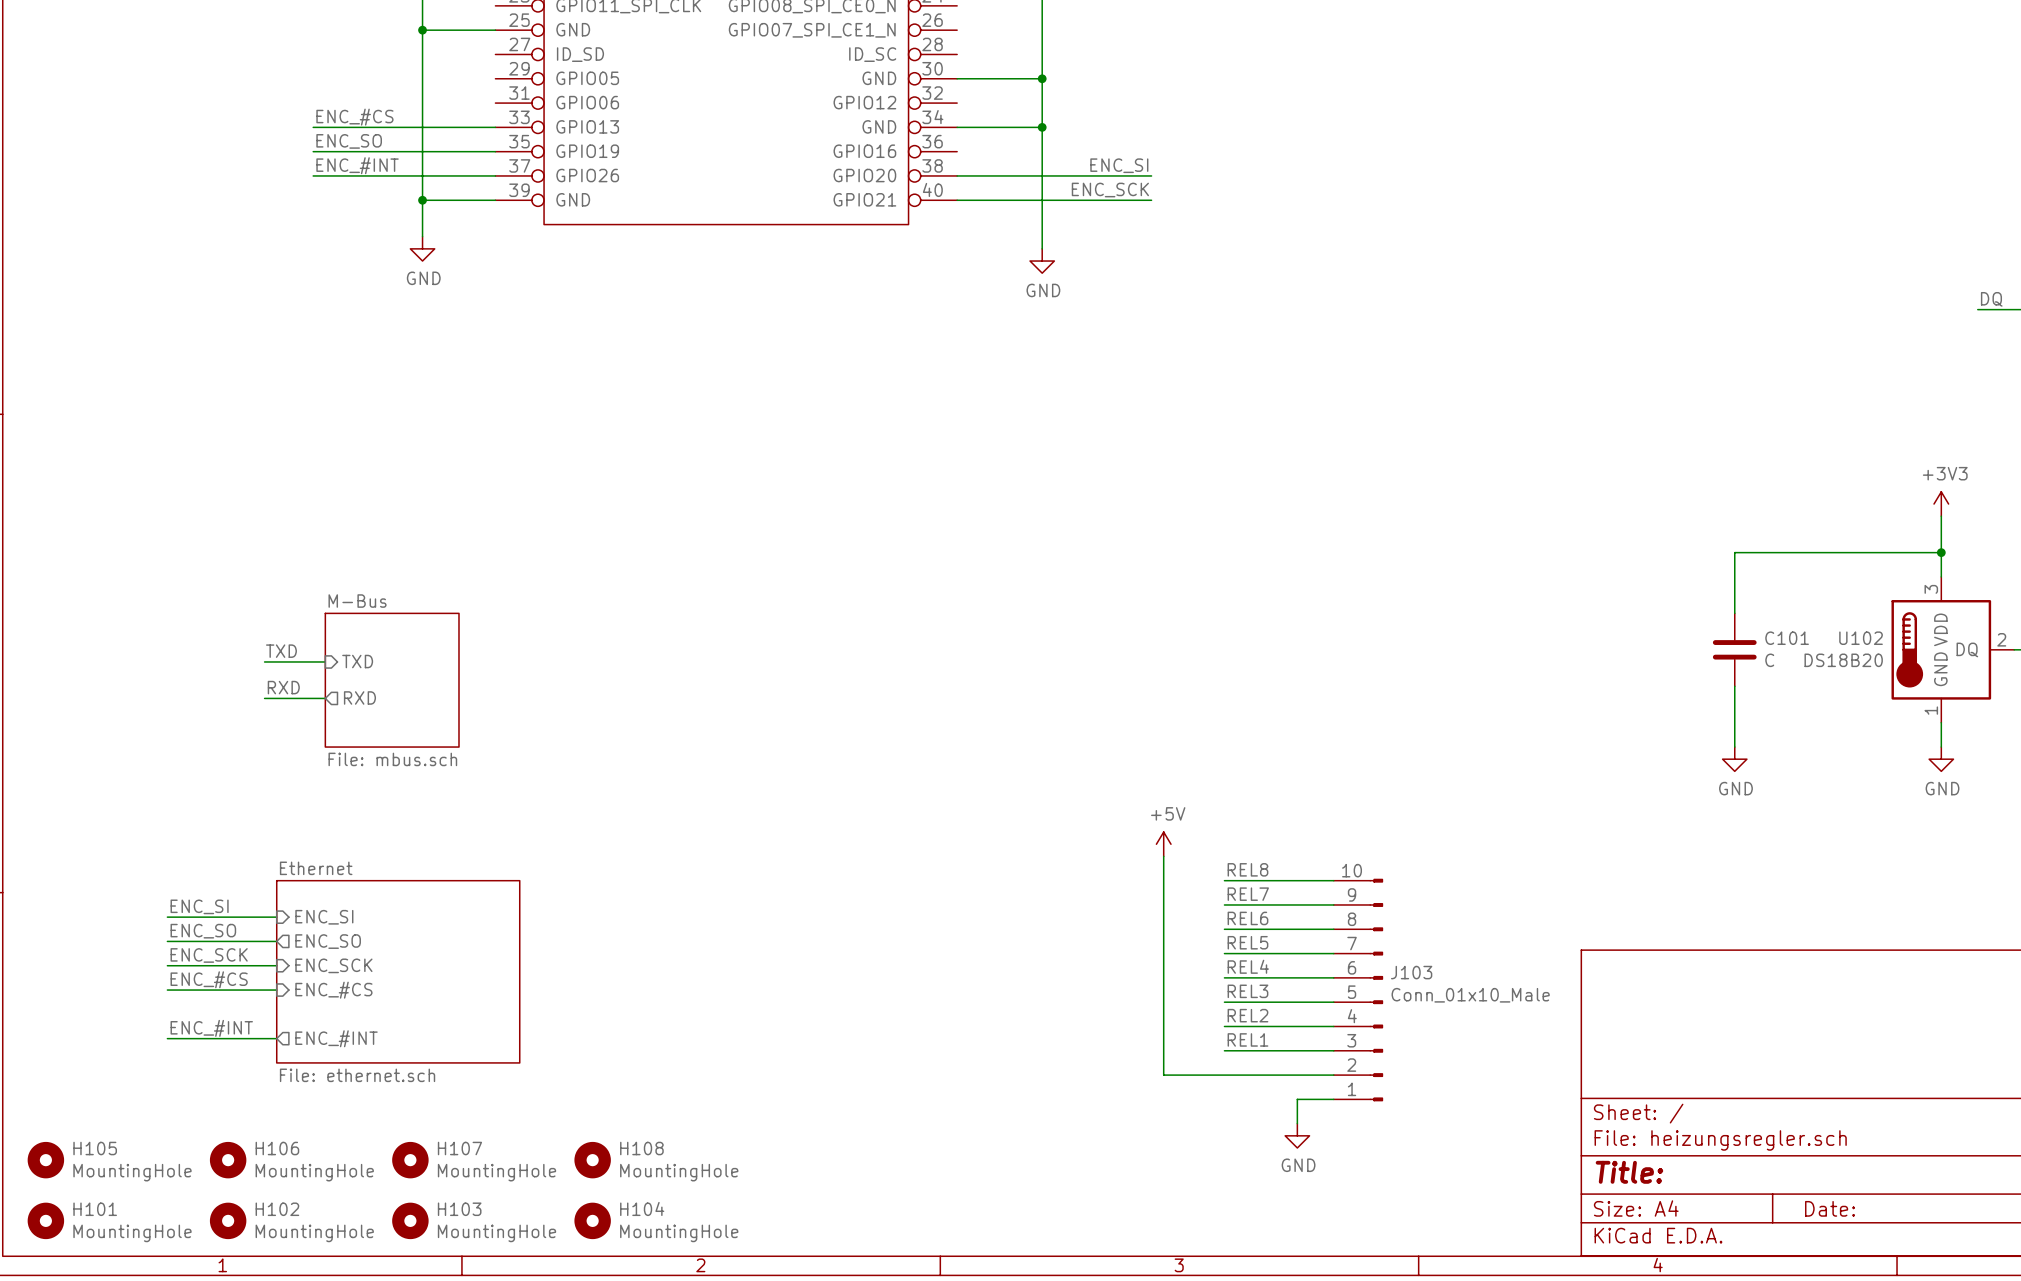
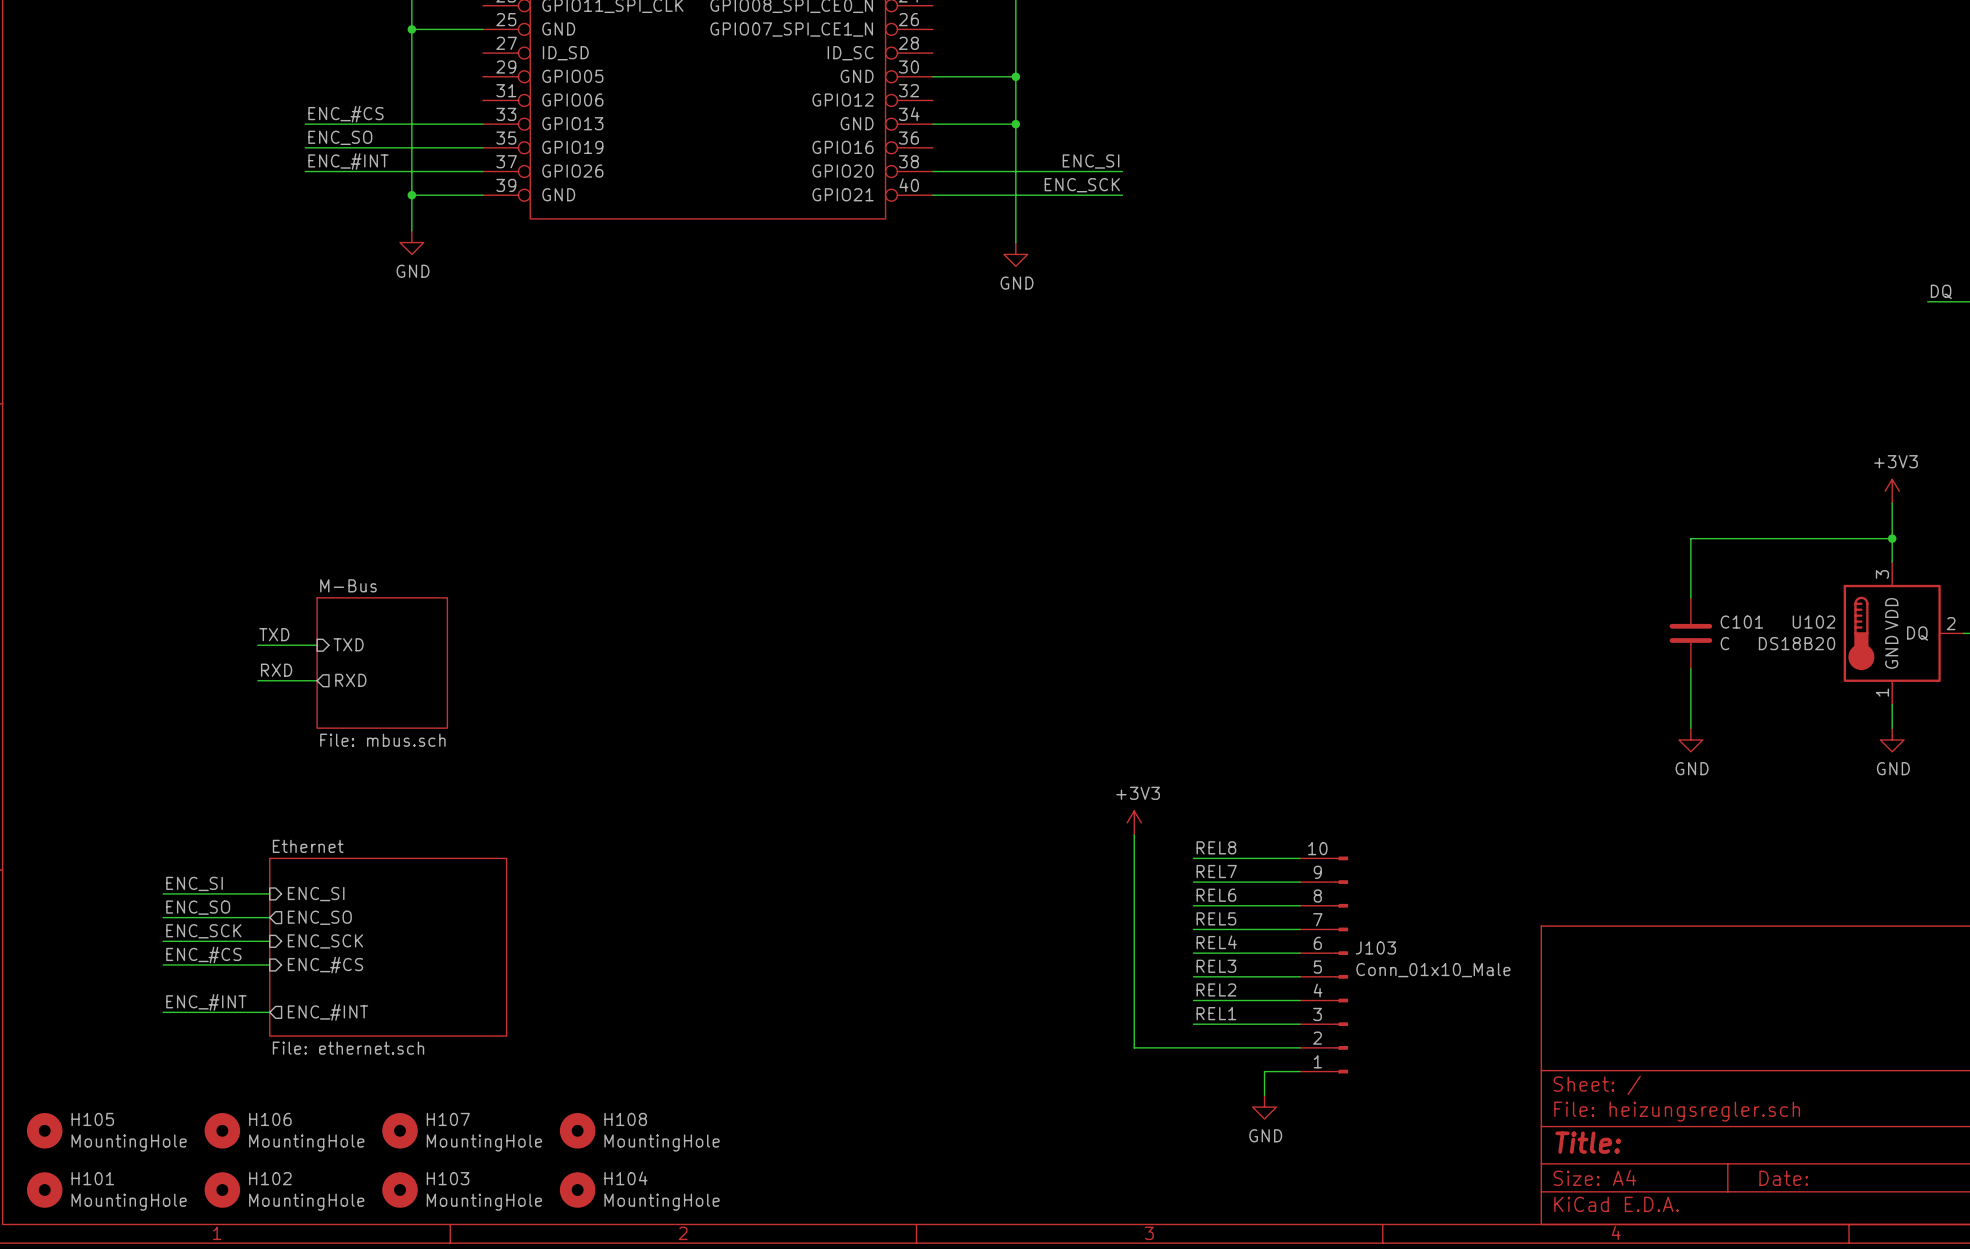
power symbol: +5V (1163, 844) -> +3V3 (1134, 822)

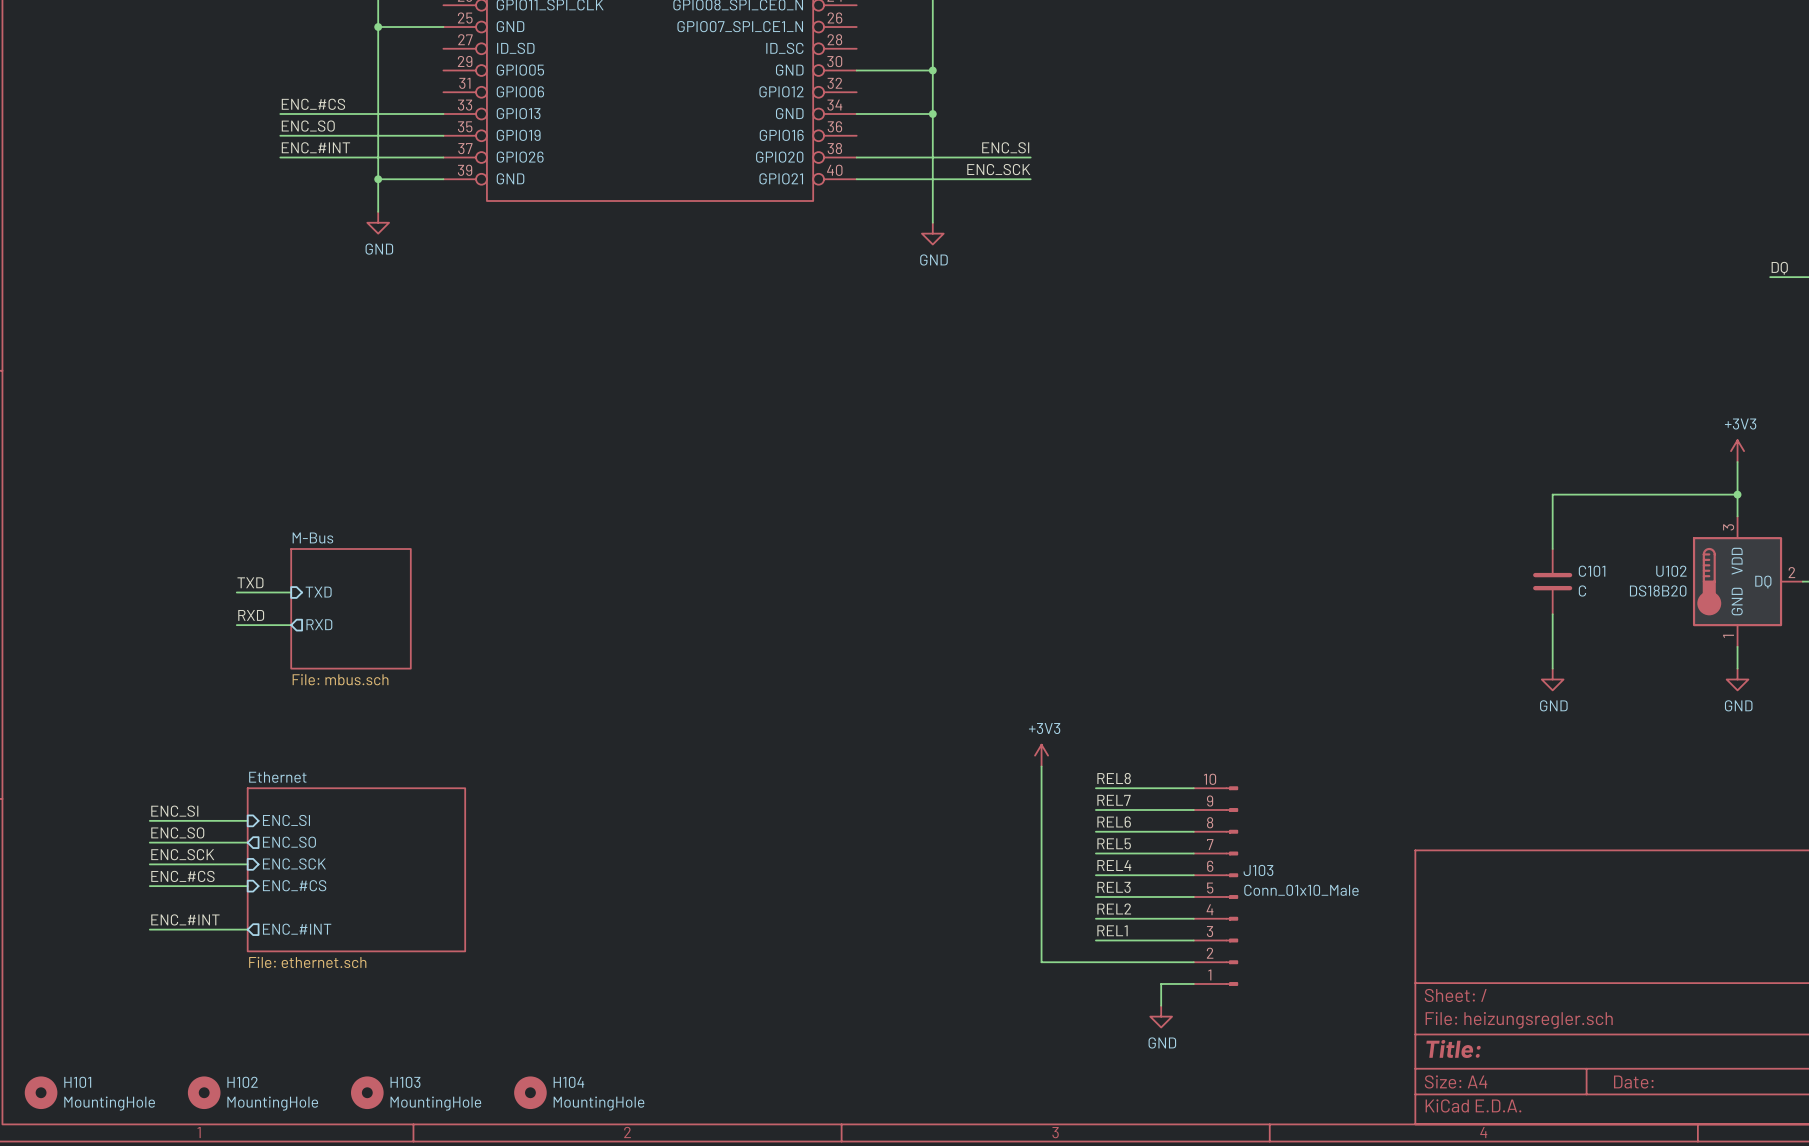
H105: MountingHole (44, 1130) -> none
H106: MountingHole (222, 1130) -> none
H107: MountingHole (400, 1130) -> none
H108: MountingHole (577, 1130) -> none

